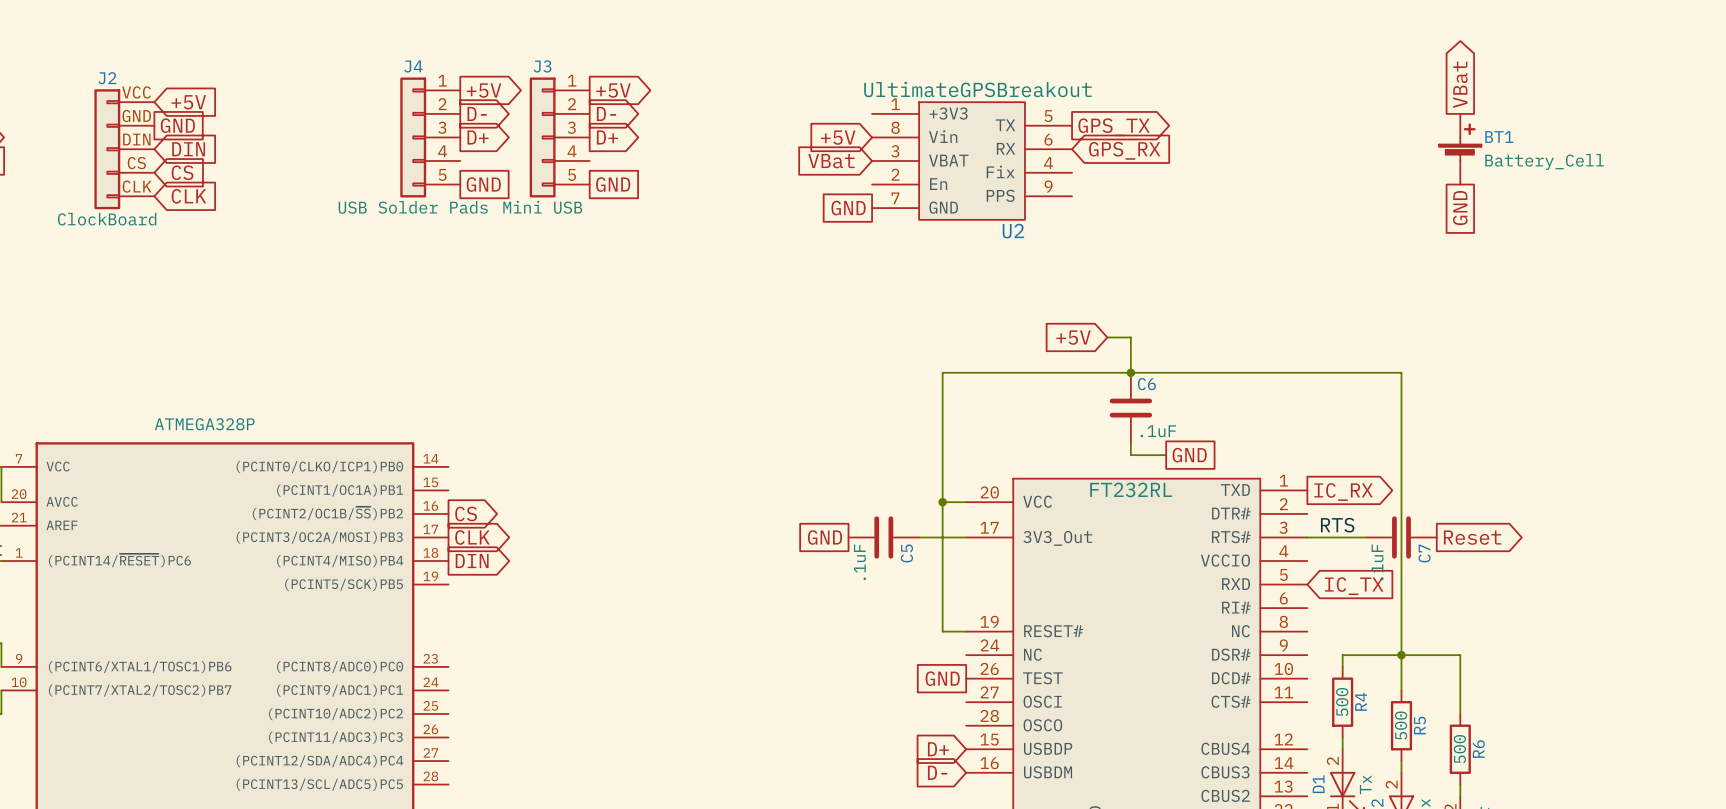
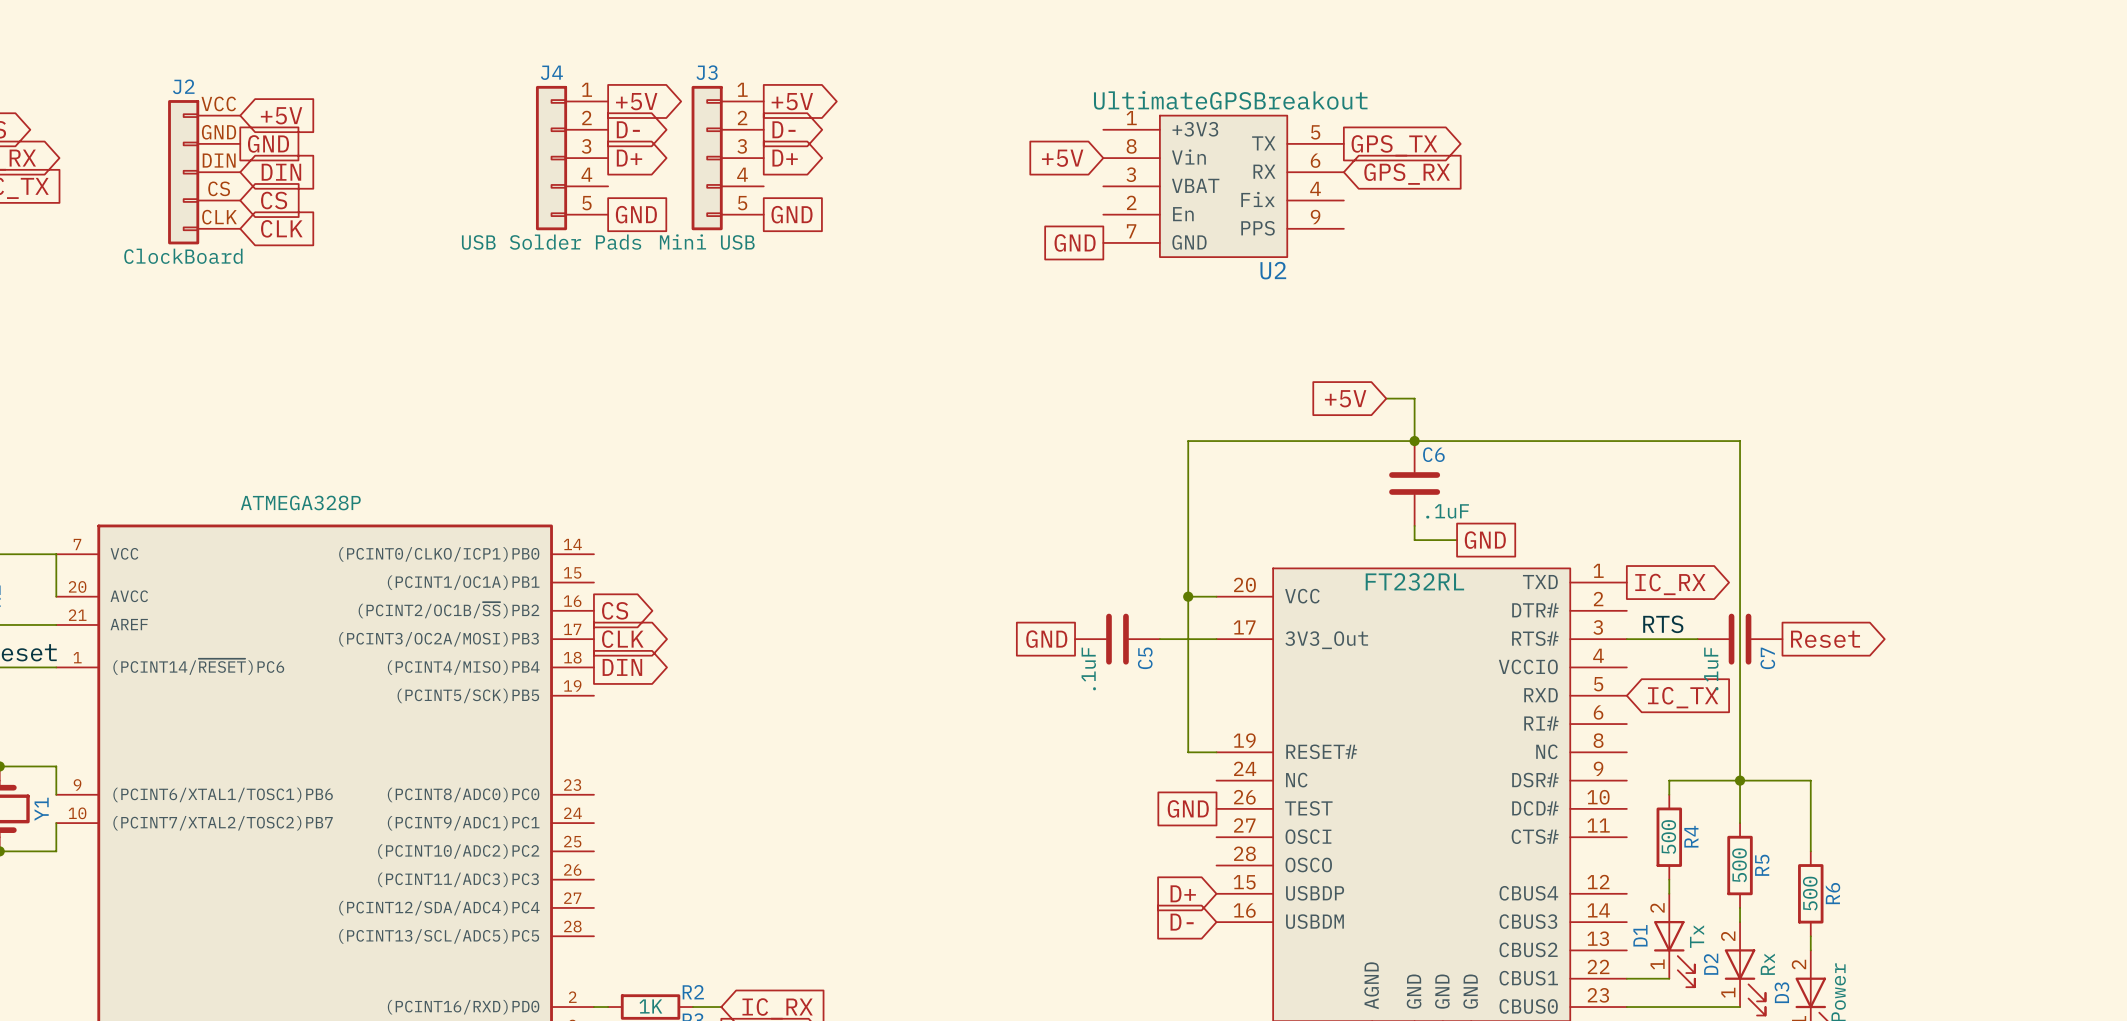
global label: VBat (1460, 84) -> none
BT1: Battery_Cell (1460, 149) -> none
global label: VBat (831, 161) -> none
global label: GND (1460, 208) -> none

